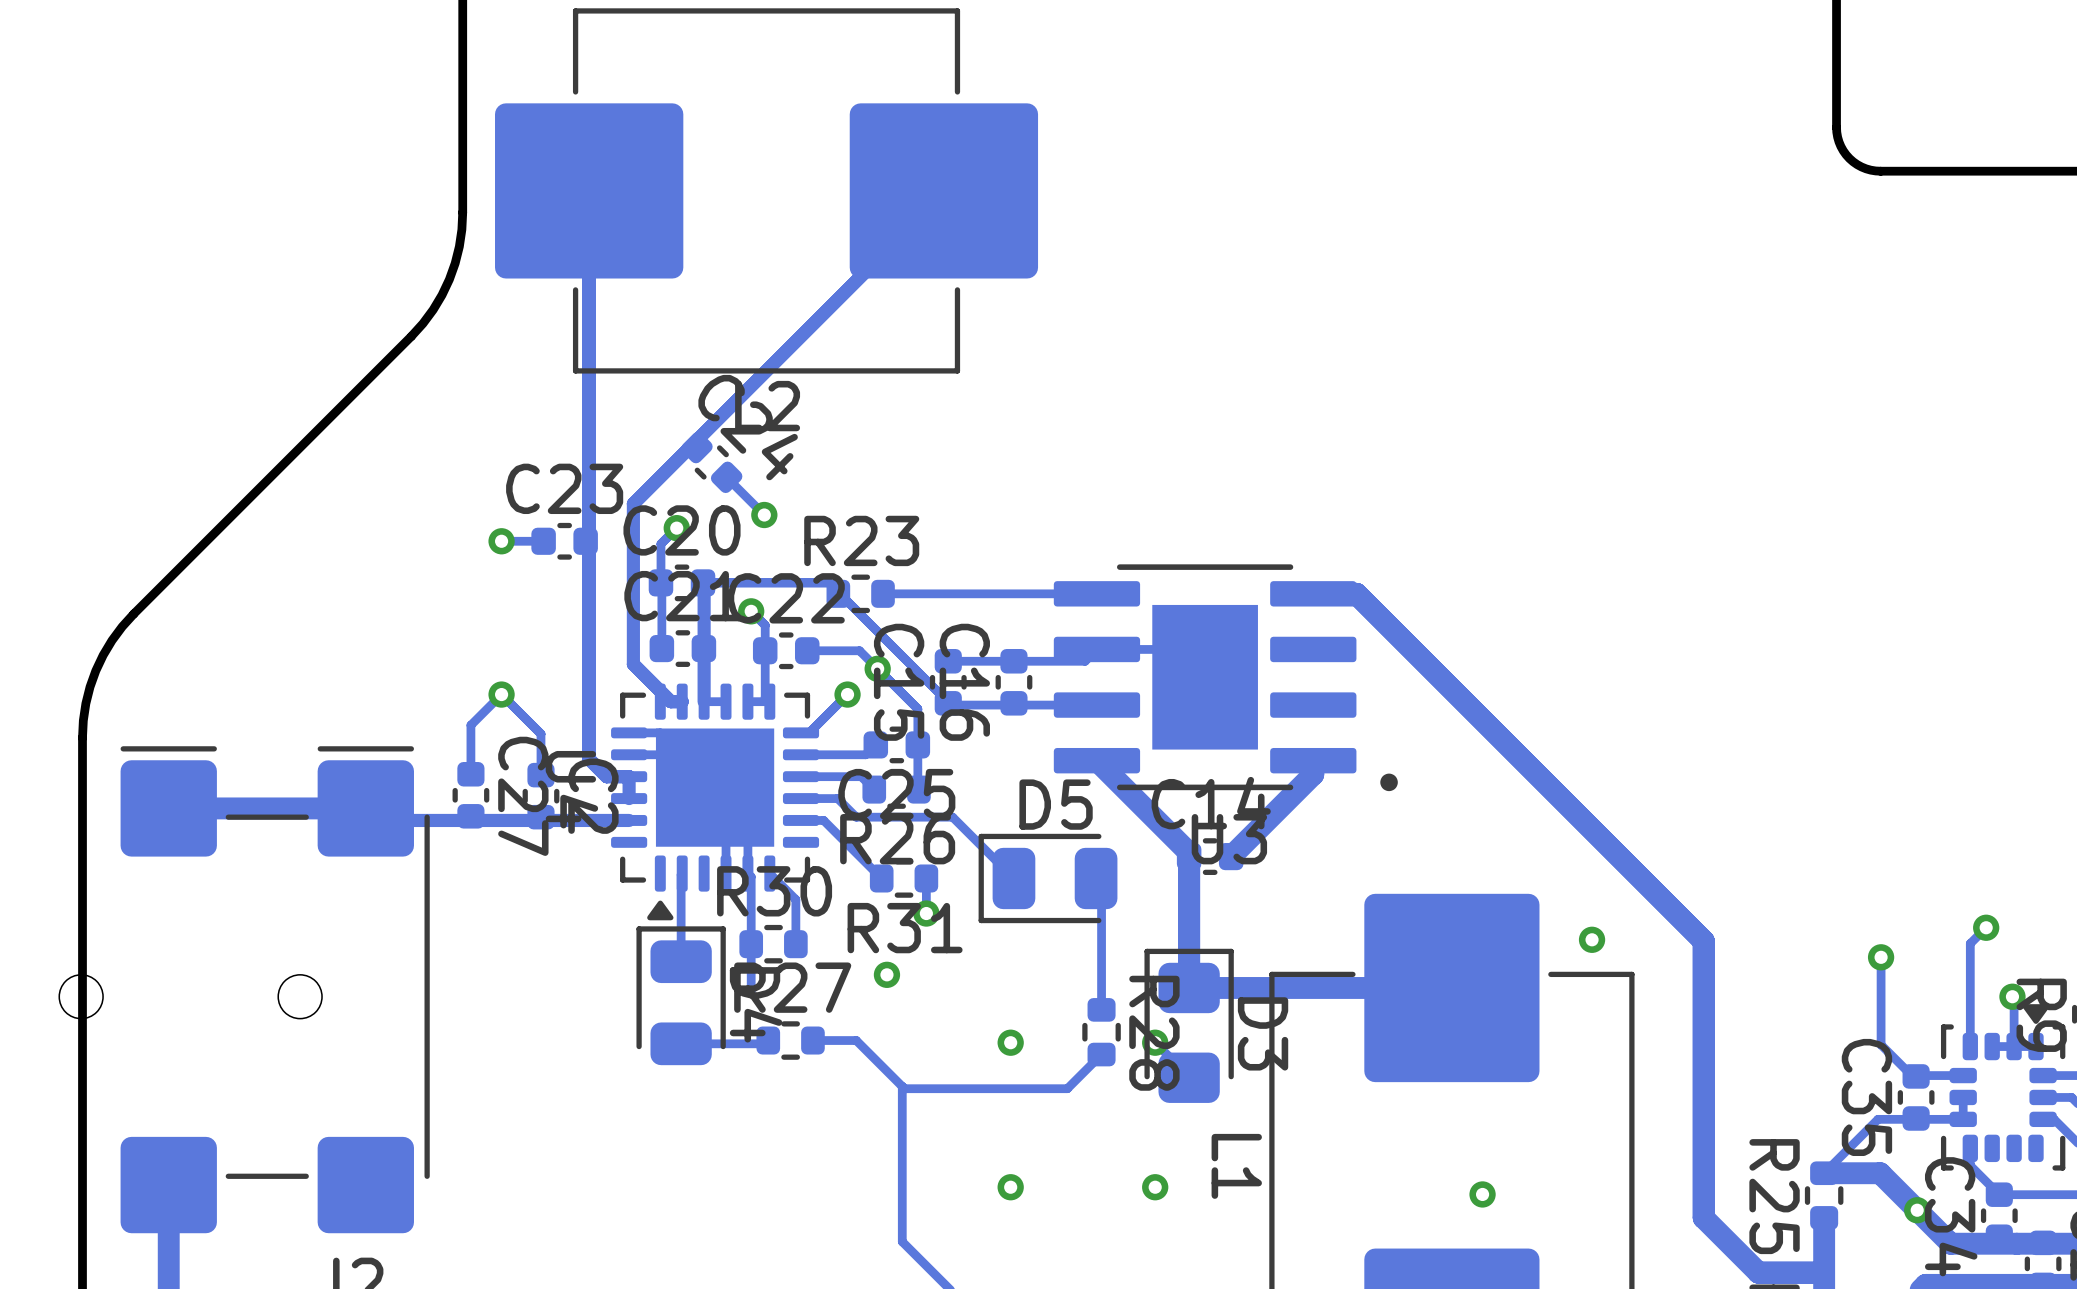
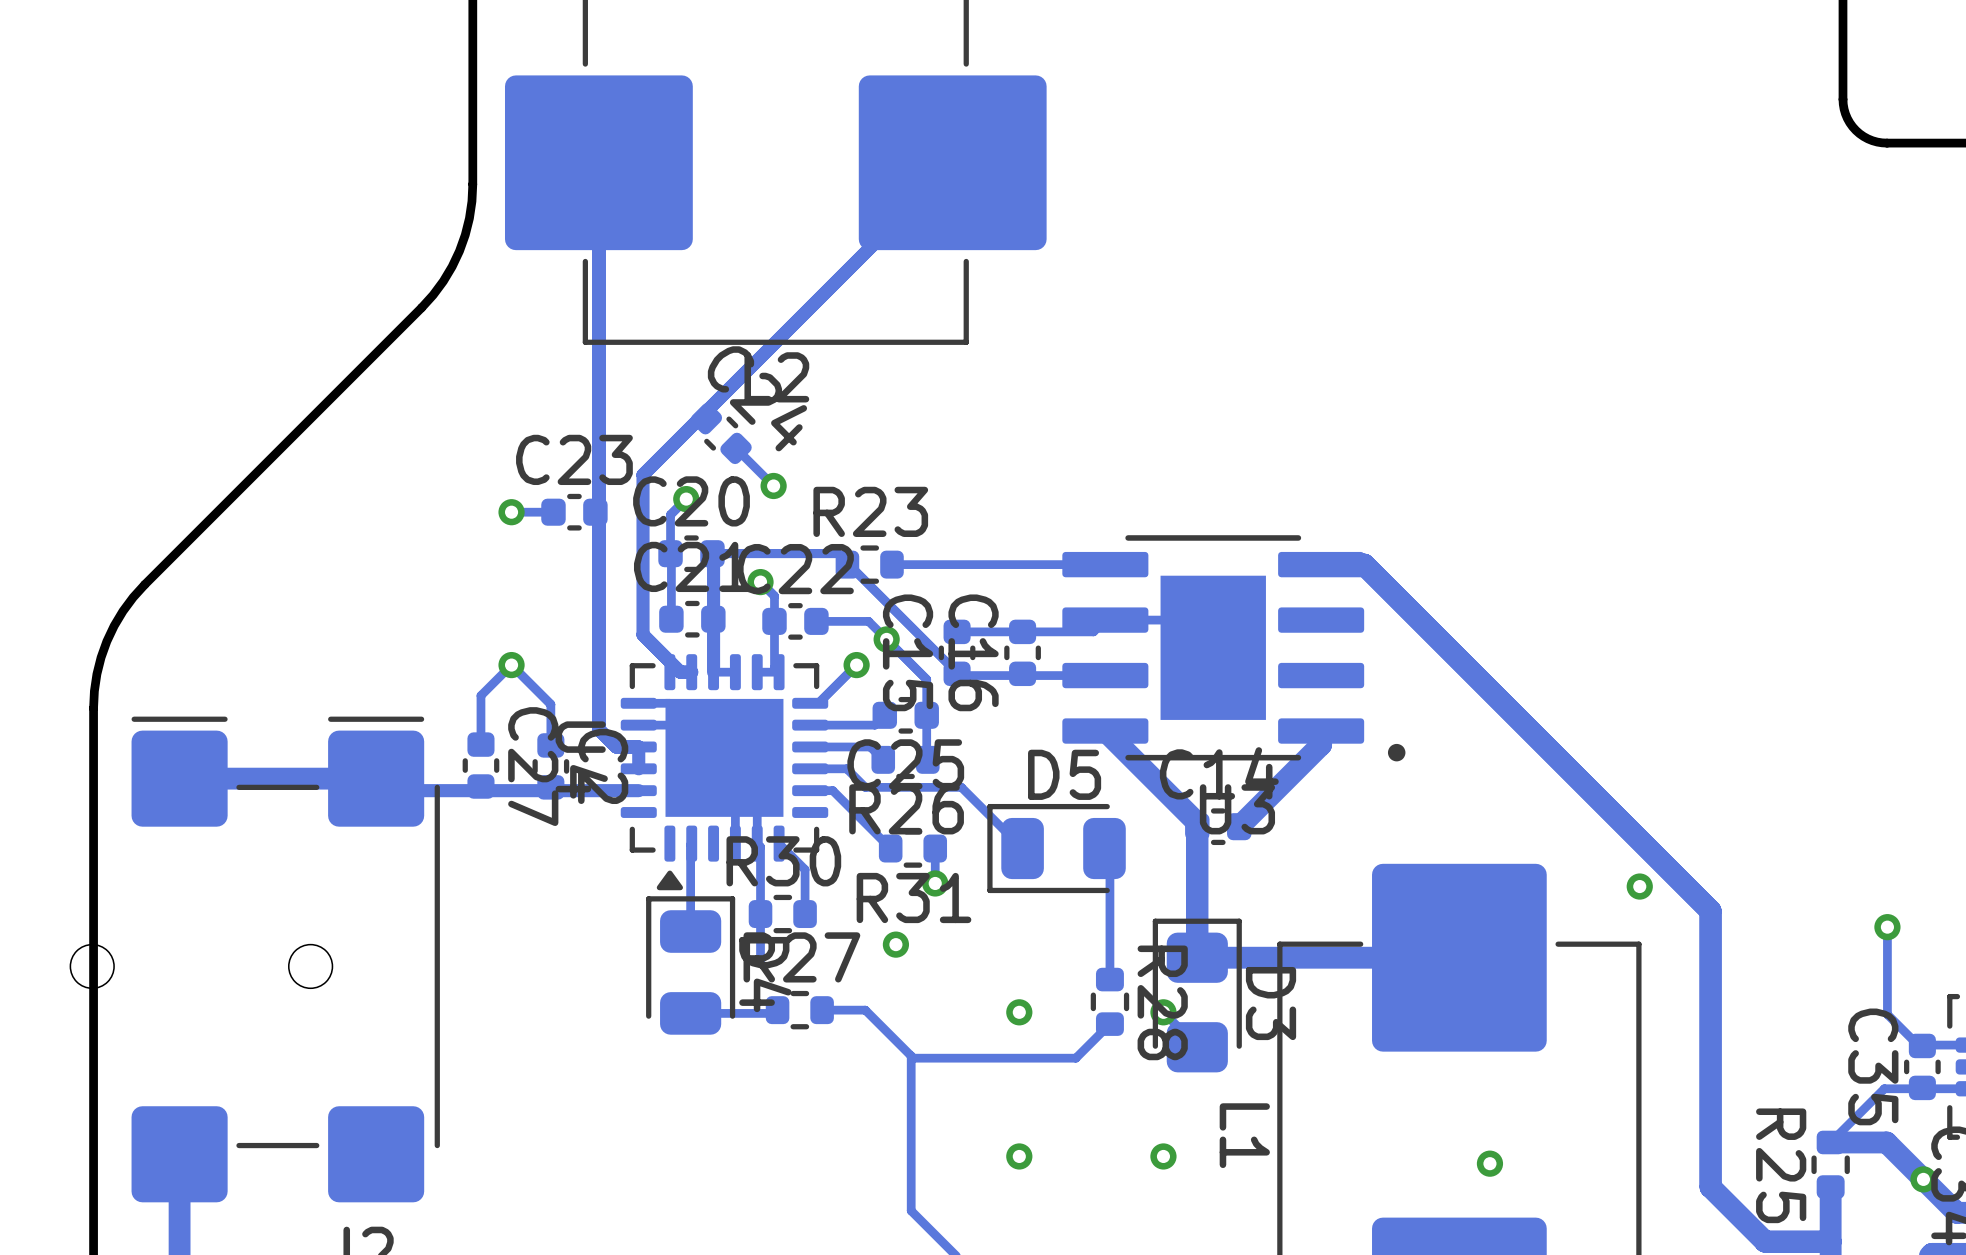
via position: (1592, 939) -> (1639, 886)

